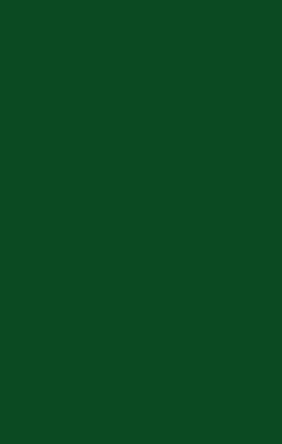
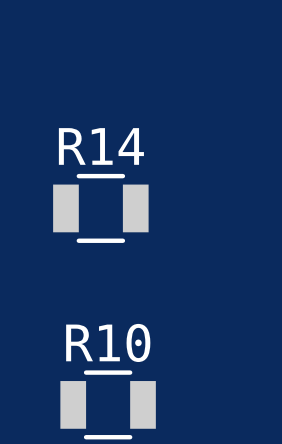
R14: none -> (100, 208)
R10: none -> (108, 404)

